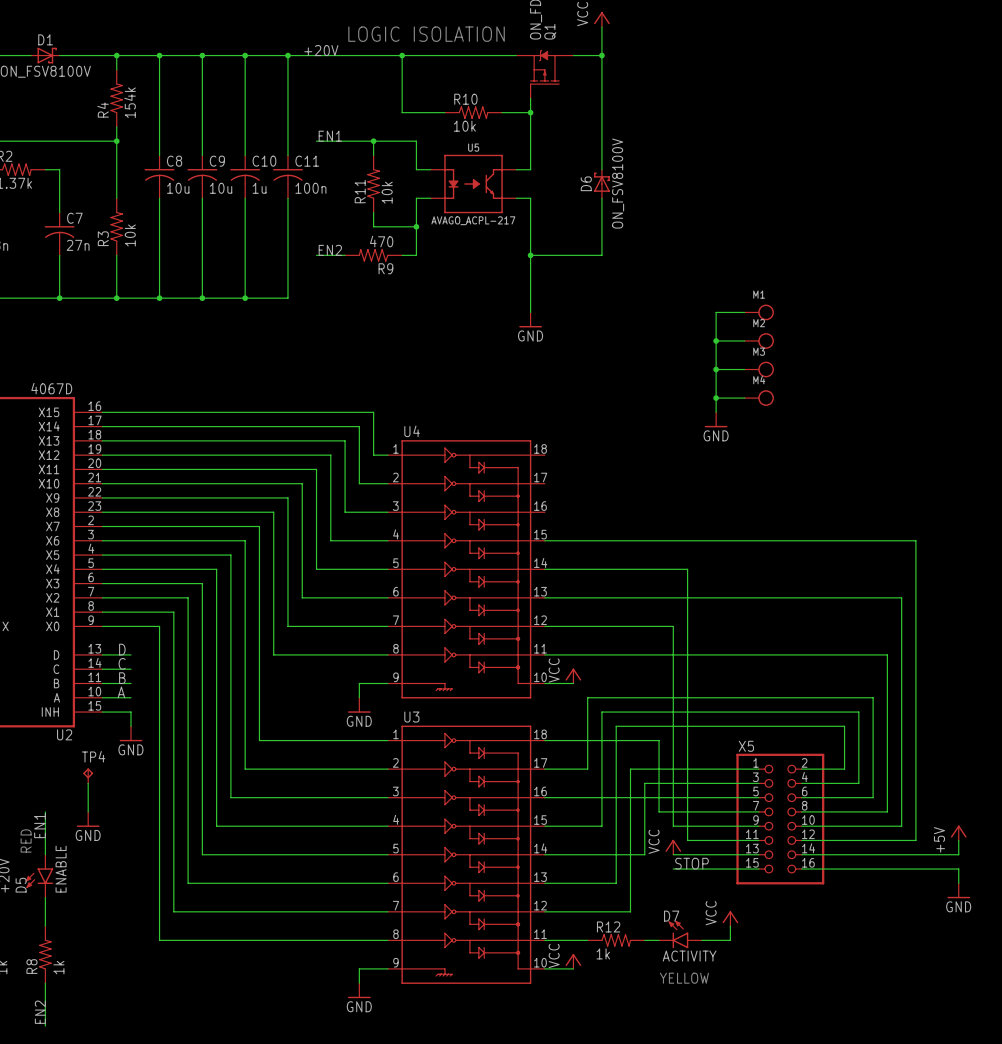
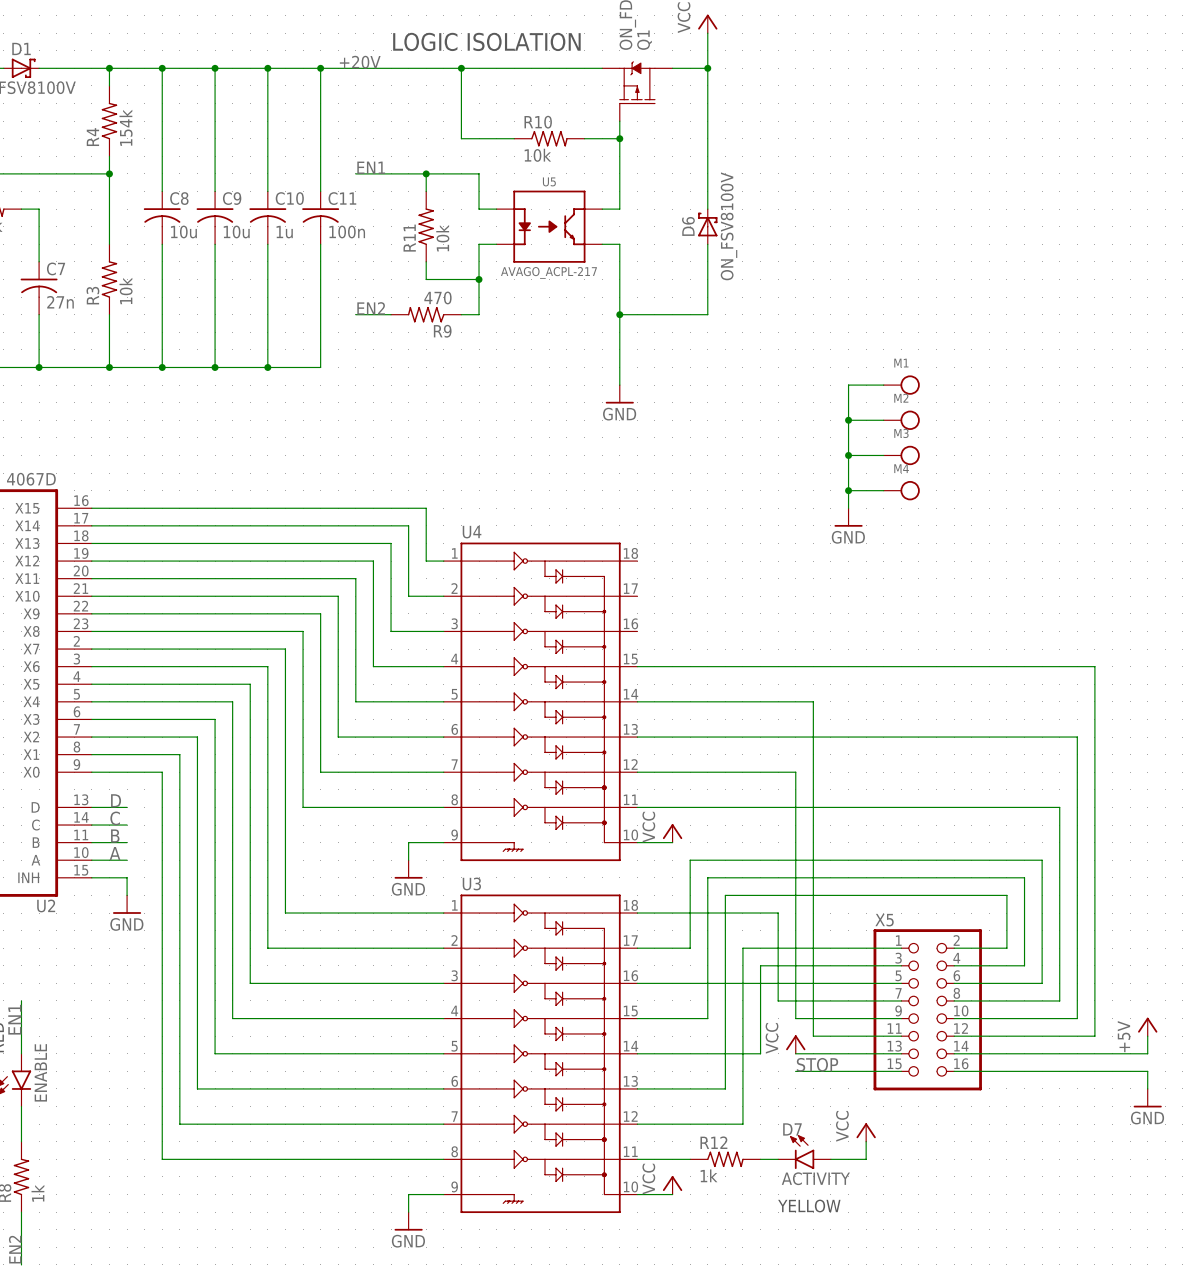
TP4: (88, 775) -> none
wire: (88, 783) (88, 811) -> none
power symbol: GND (88, 819) -> none

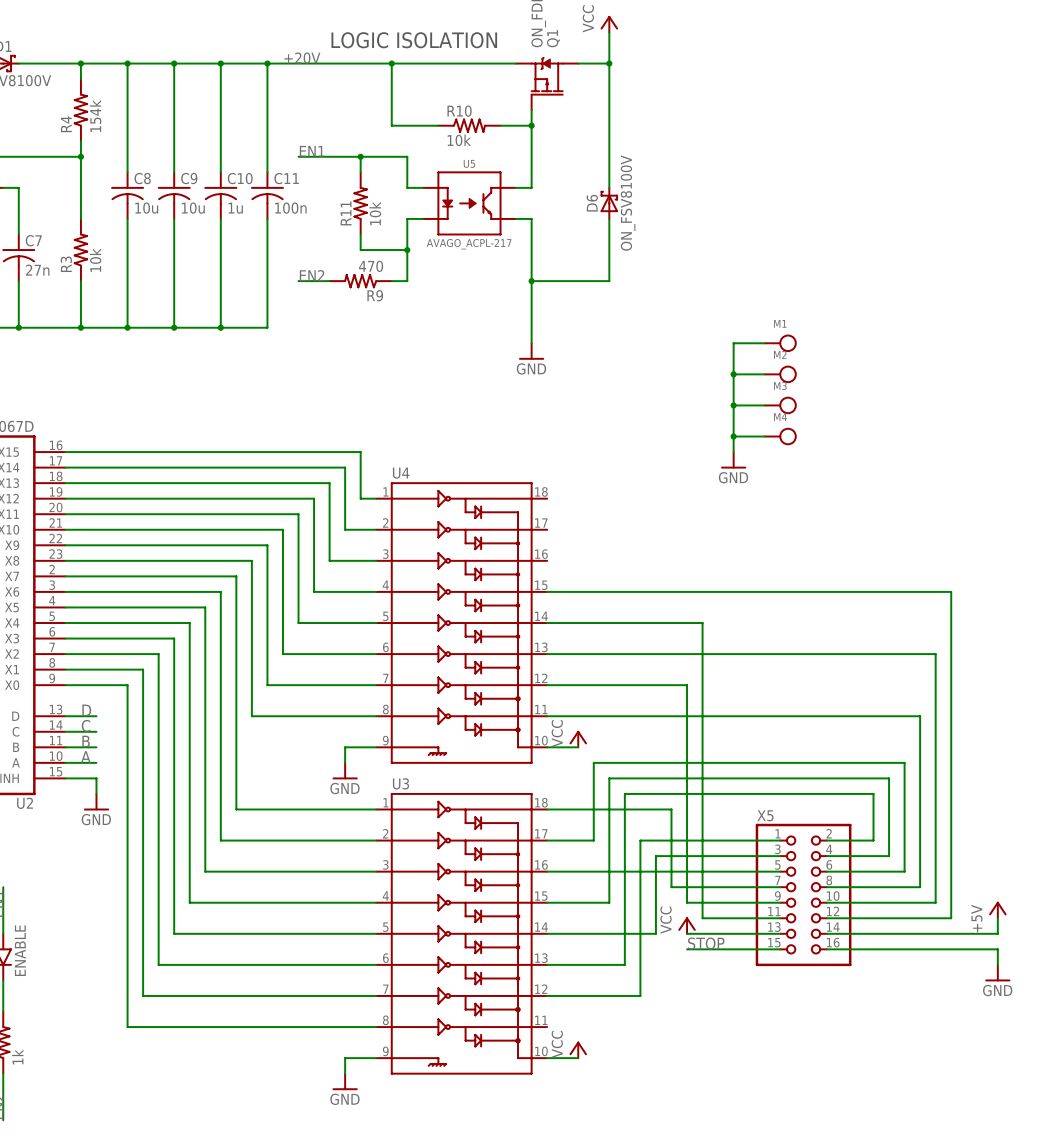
power symbol: VCC (866, 1132) -> none
wire: (866, 1141) (866, 1159) (830, 1159) -> none
D7: ACTIVITY (804, 1152) -> none
wire: (637, 1159) (690, 1159) -> none
R12: 1k (725, 1159) -> none
wire: (760, 1159) (778, 1159) -> none
text: YELLOW (809, 1206) -> none

